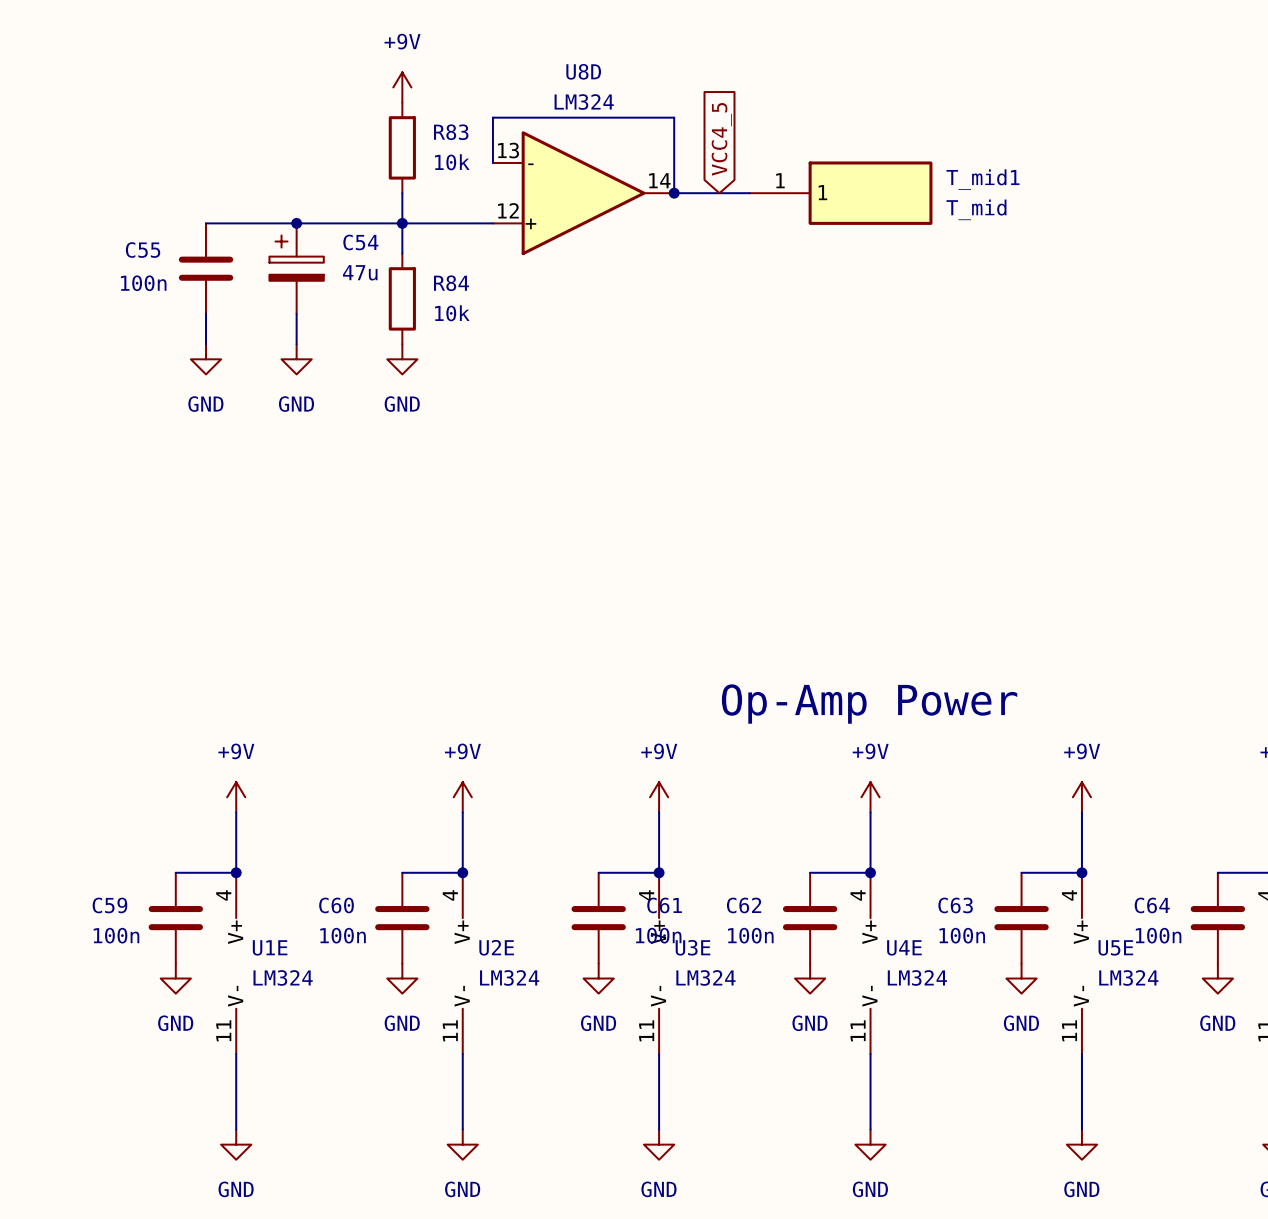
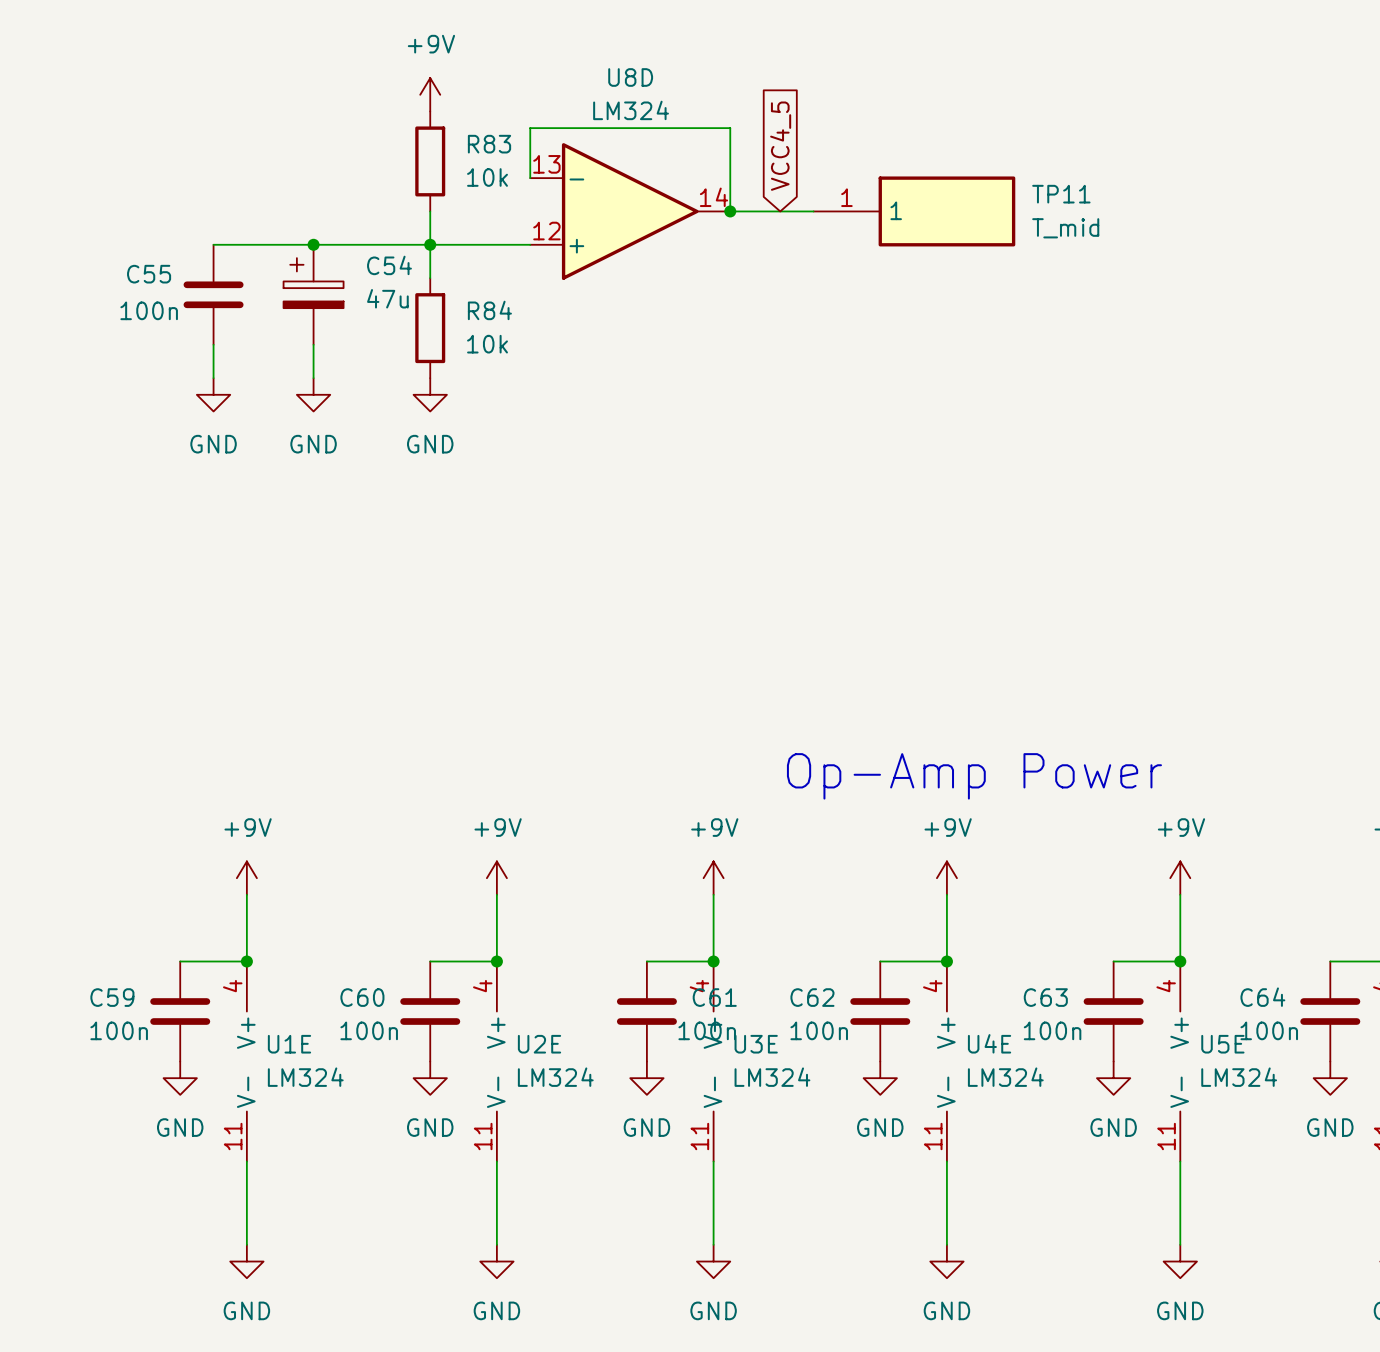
T_mid1 name: T_mid1 (982, 179) -> TP11 (1061, 194)

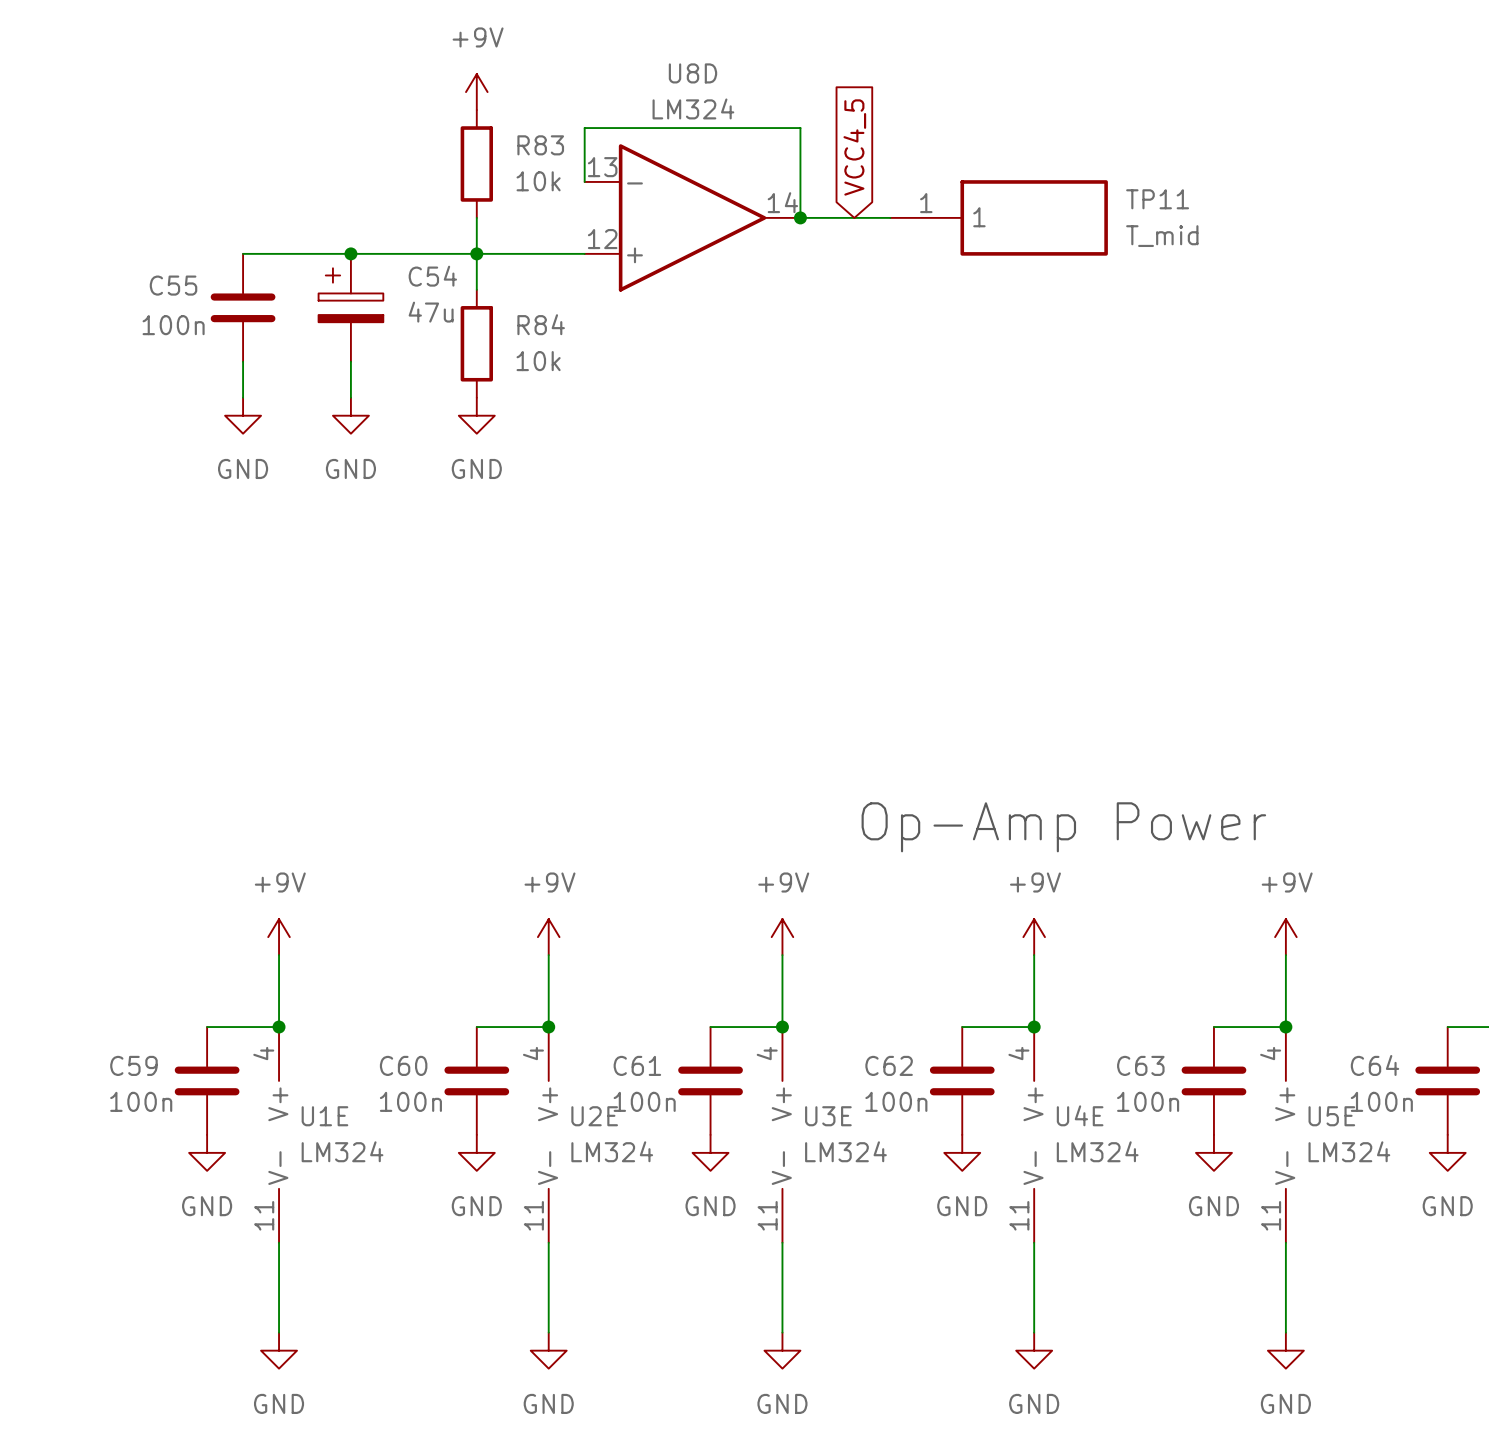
C61 name position: C61 (714, 997) -> C61 (637, 1065)
C61 value position: 100n (707, 1030) -> 100n (644, 1101)

